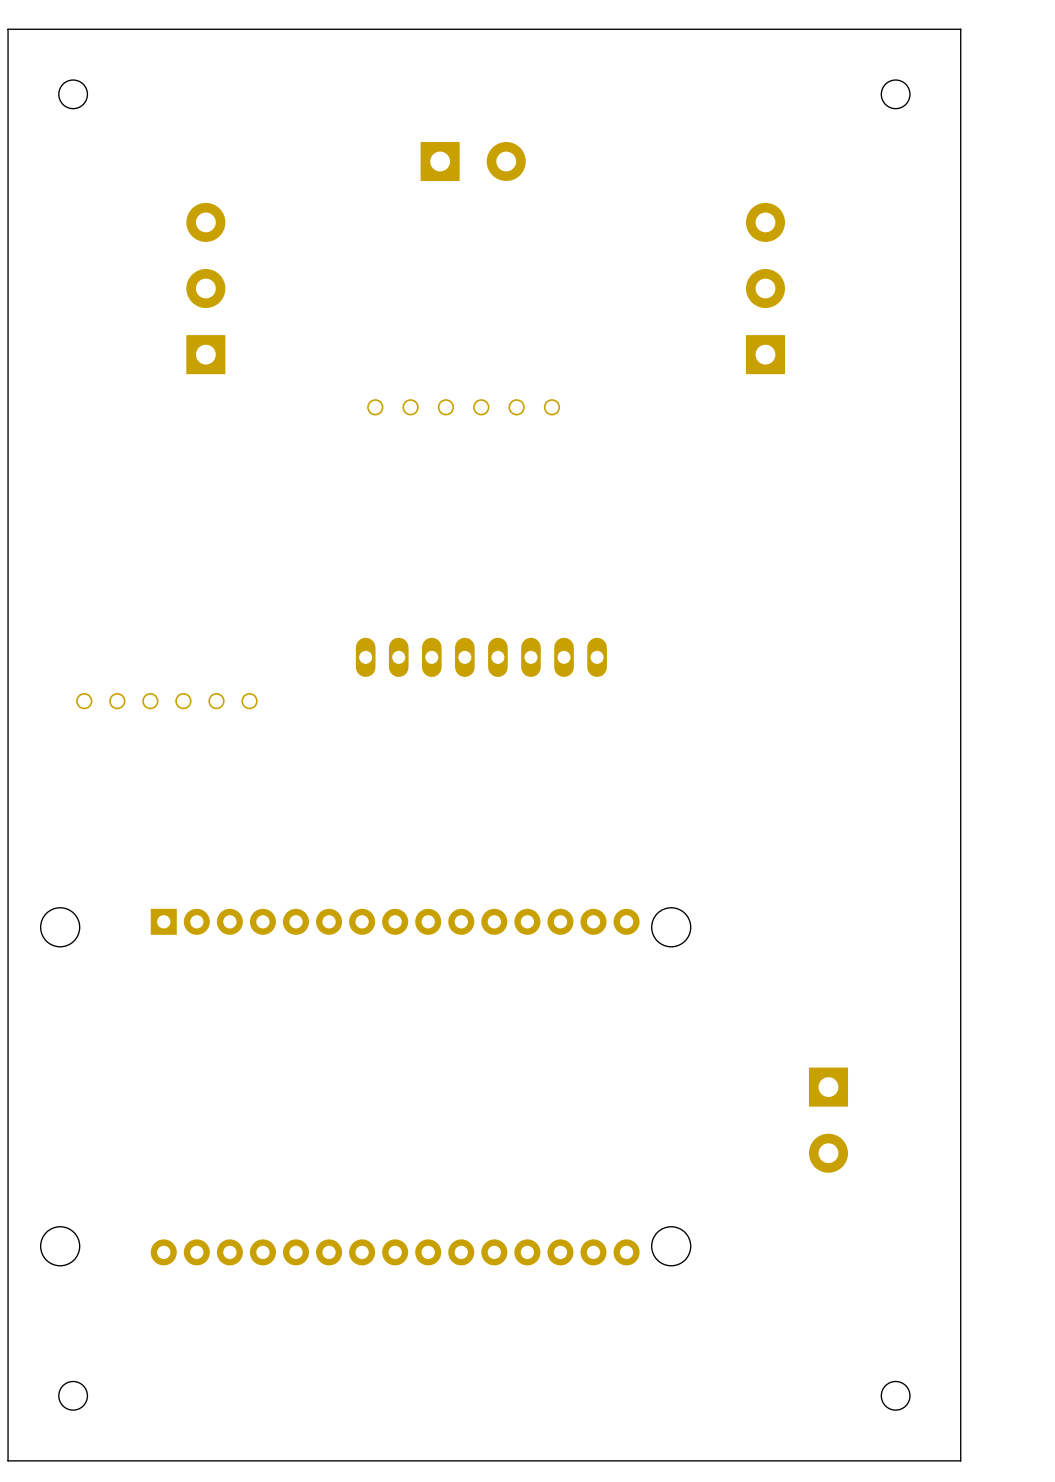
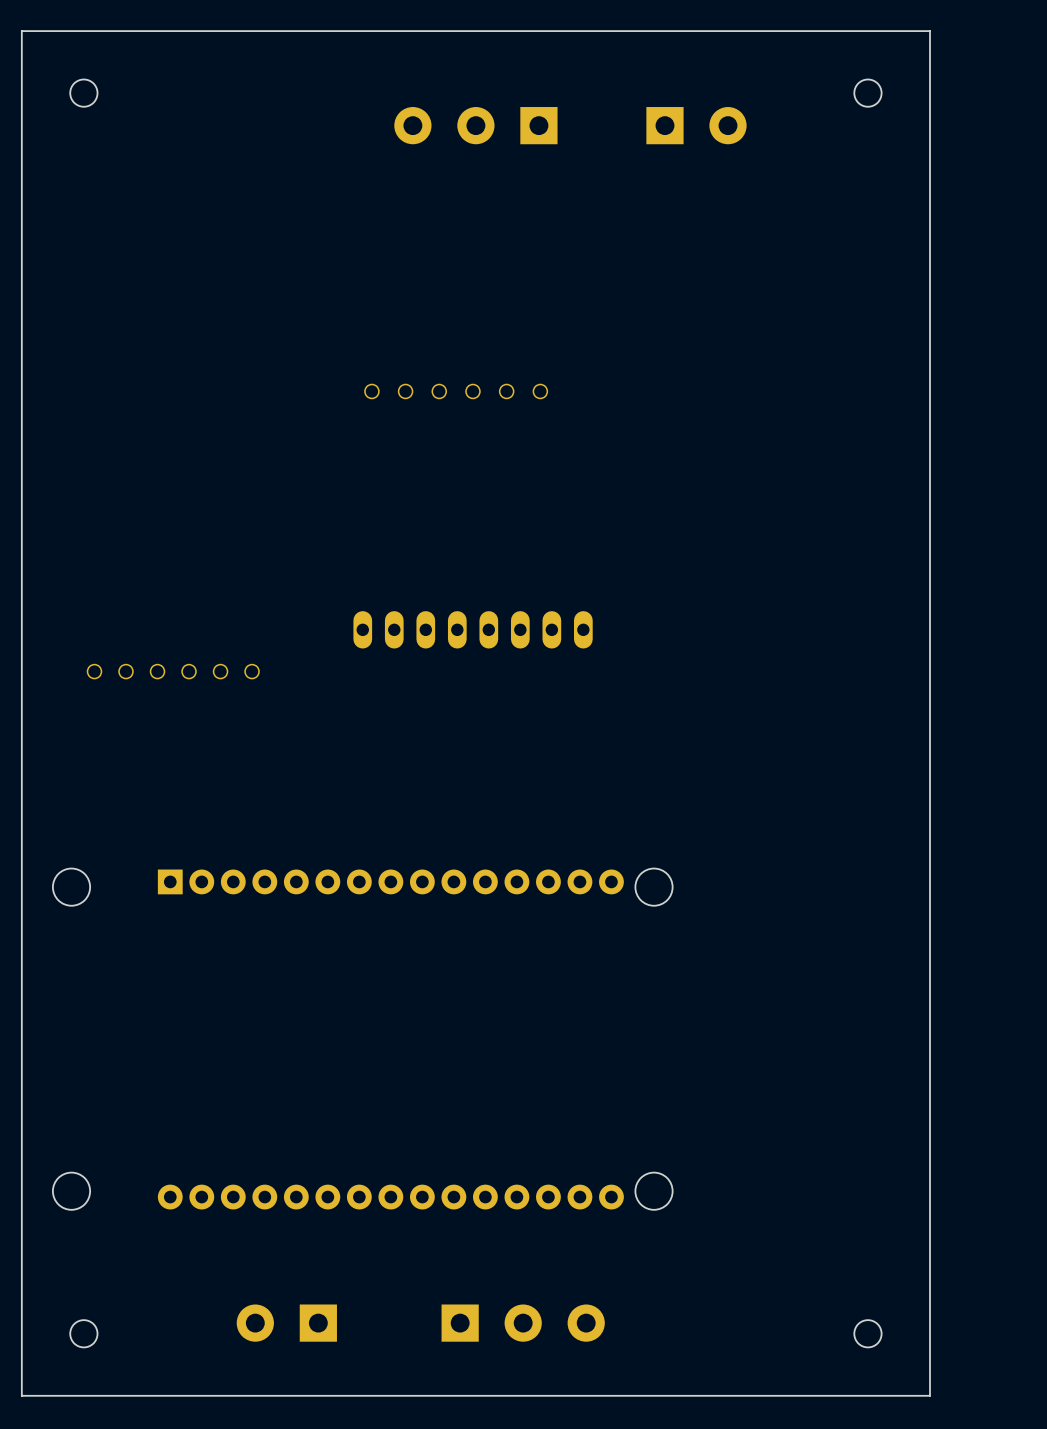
part: none -> (475, 125)
part position: (473, 161) -> (696, 125)
part: (205, 288) -> none
part: (765, 288) -> none
part: (828, 1120) -> none
part: none -> (286, 1323)
part: none -> (523, 1323)

